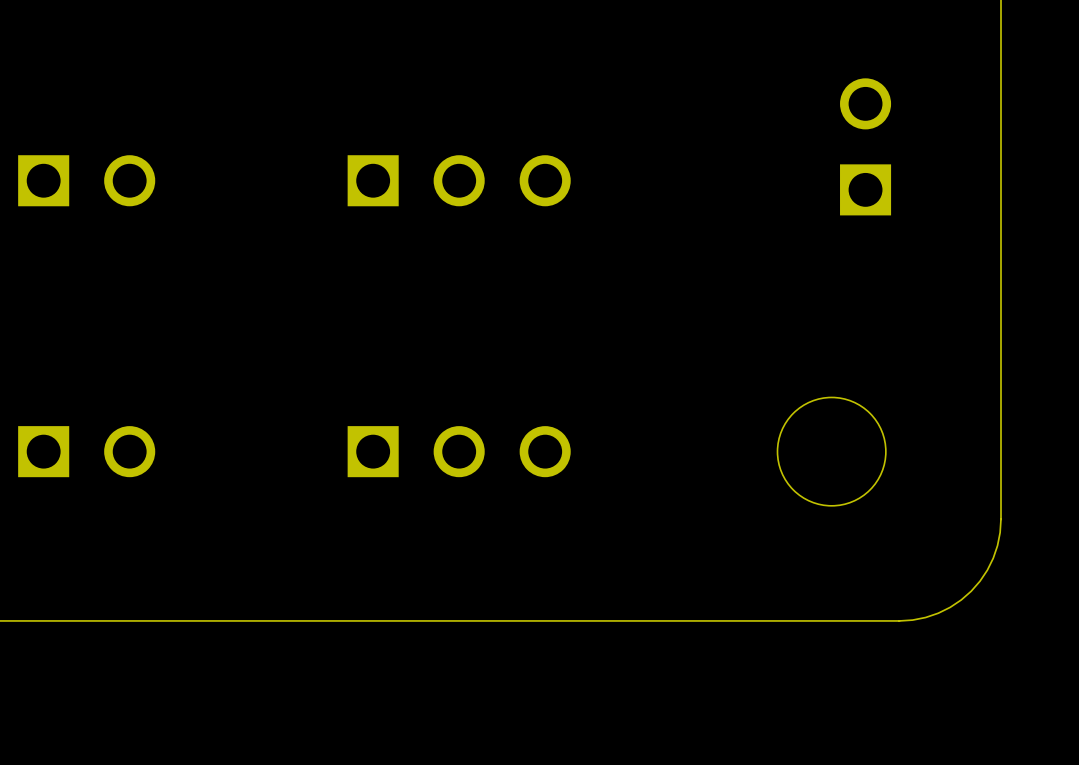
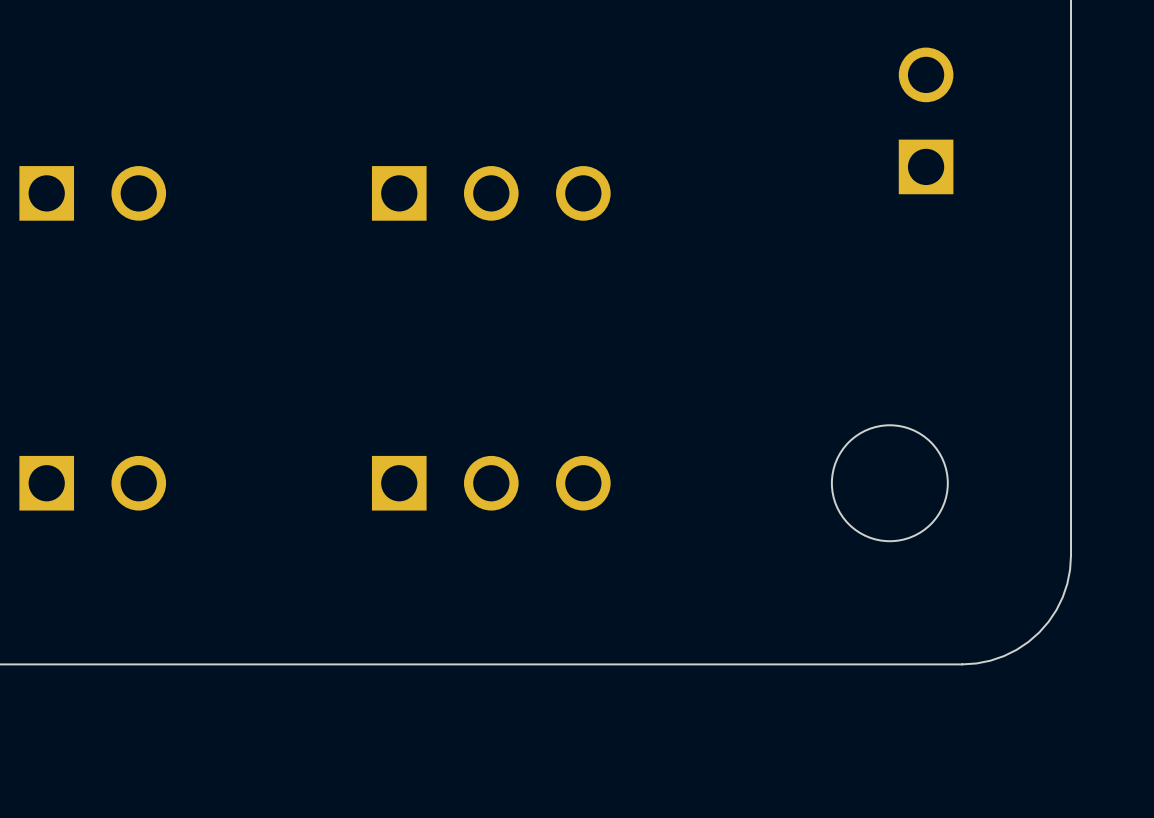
part position: (865, 146) -> (926, 120)

